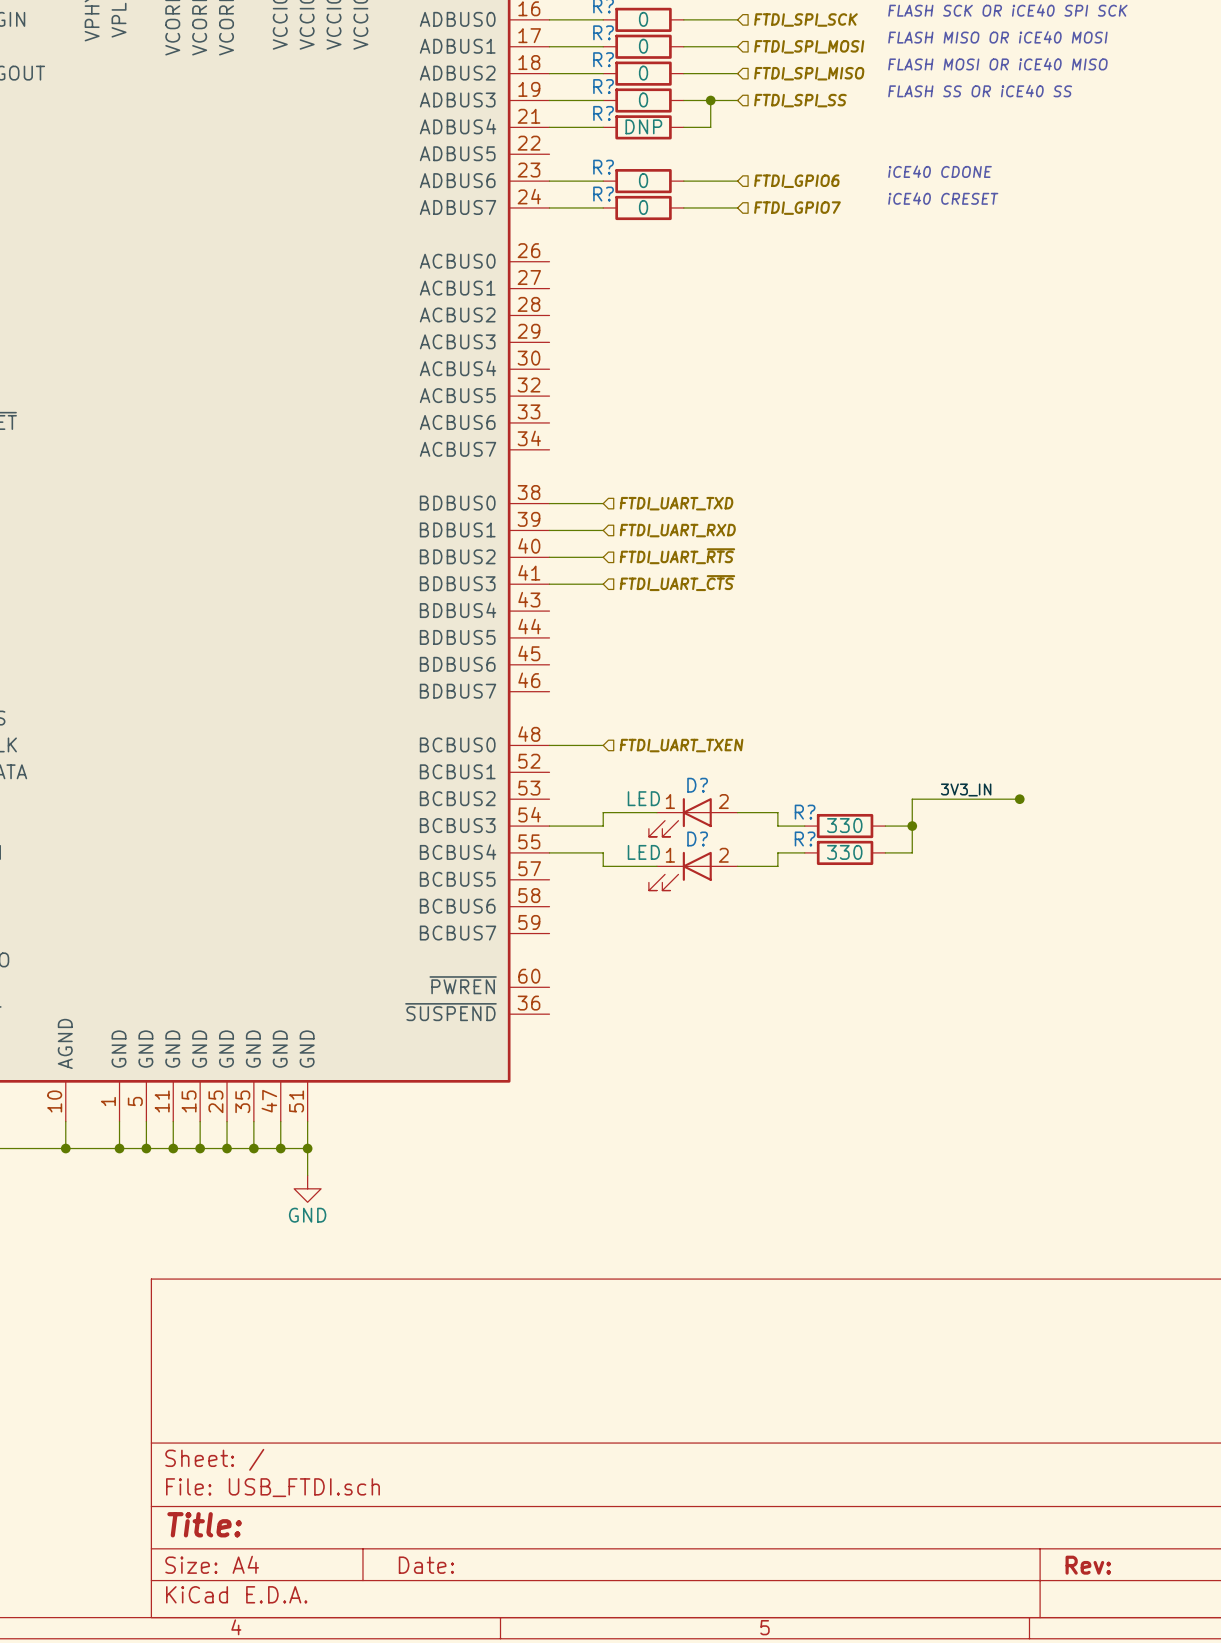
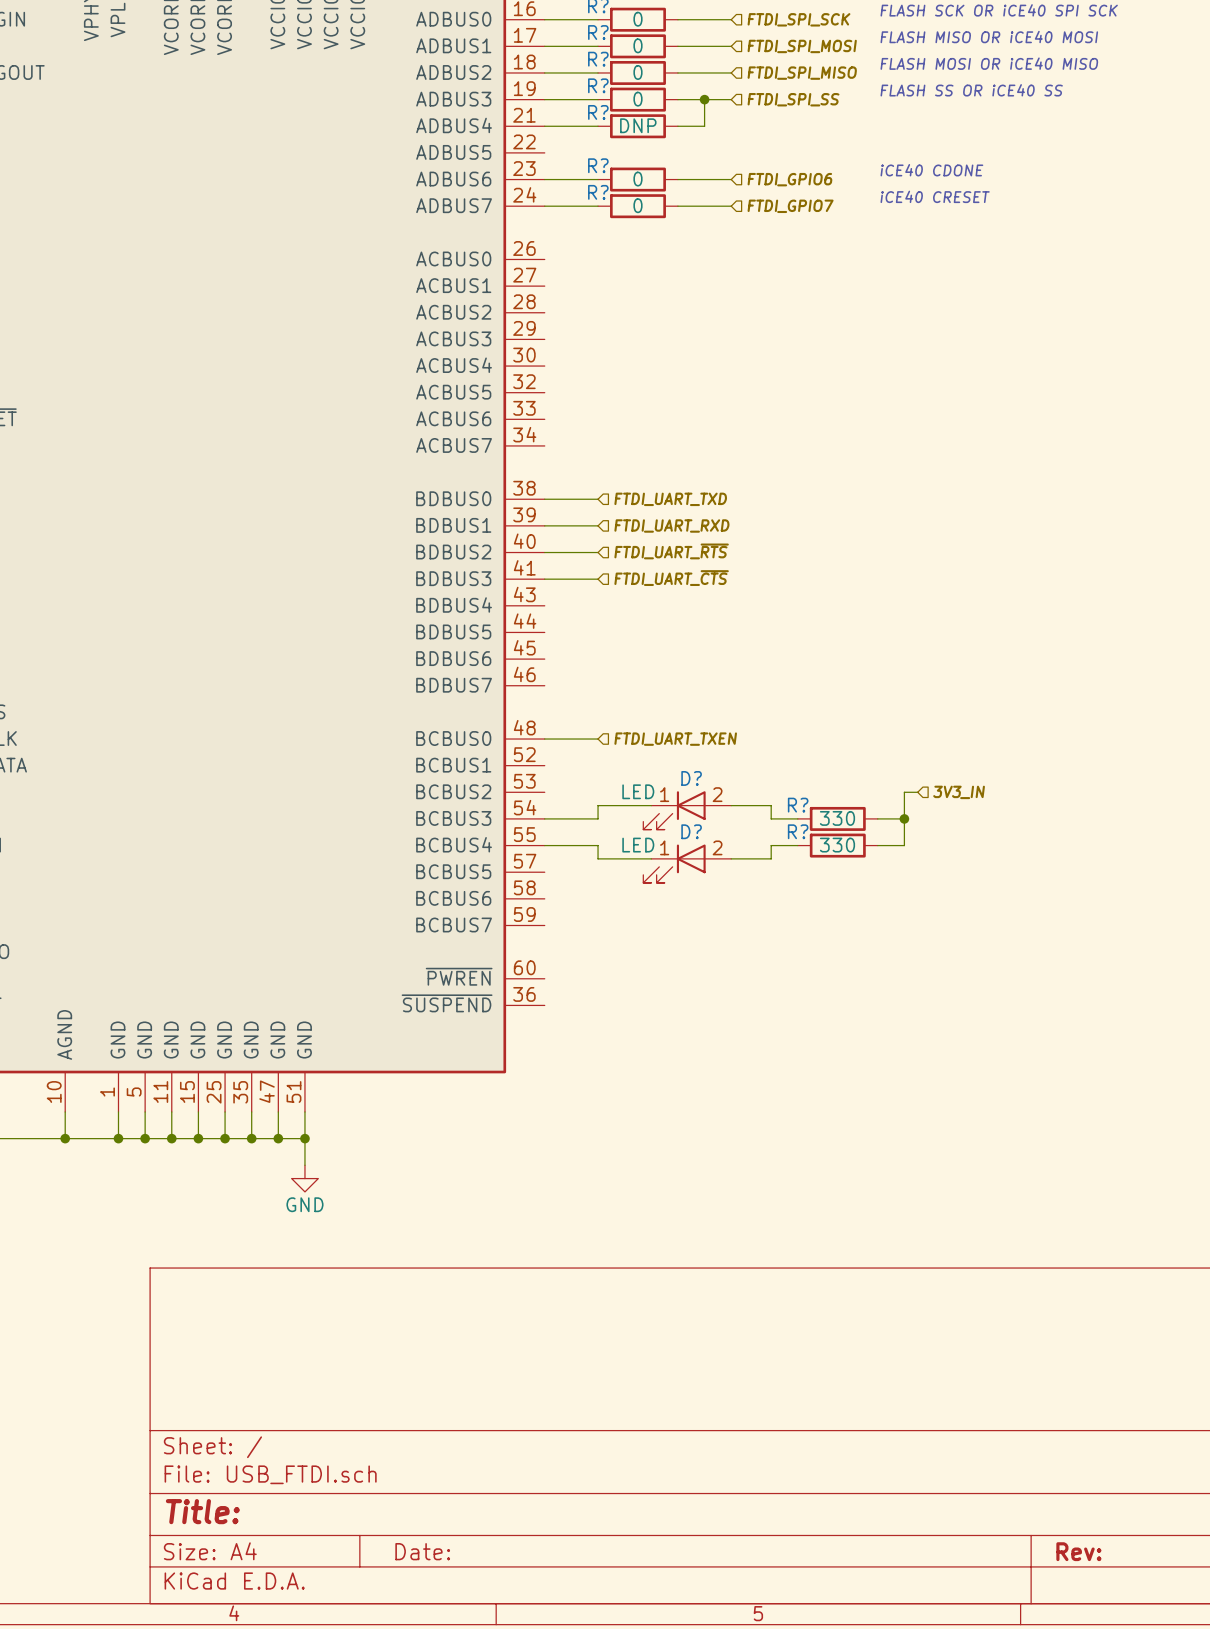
label: 3V3_IN (966, 789) -> none
wire: (925, 799) (1019, 799) -> none
hierarchical label: none -> 3V3_IN (959, 792)
junction: (1019, 799) -> none

